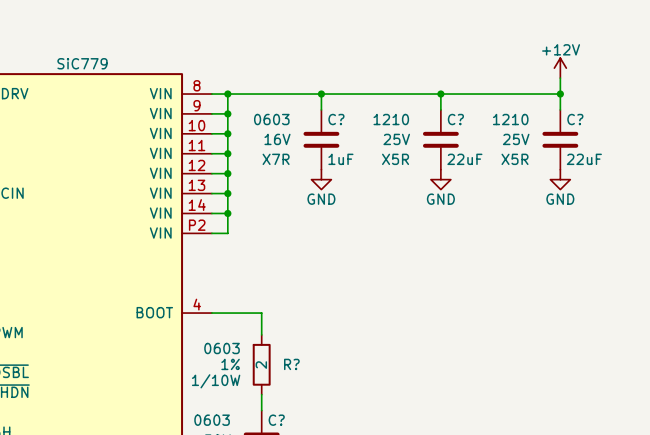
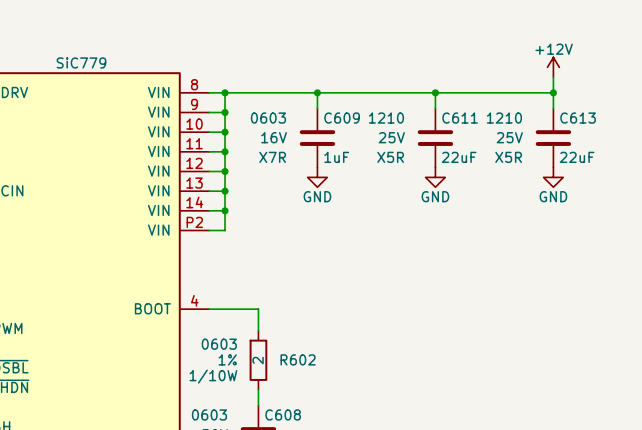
C? name: C? (336, 119) -> C609 (342, 118)
C? name: C? (455, 119) -> C611 (460, 118)
C? name: C? (575, 119) -> C613 (578, 118)
R? name: R? (291, 364) -> R602 (298, 359)
C? name: C? (276, 420) -> C608 (283, 414)

